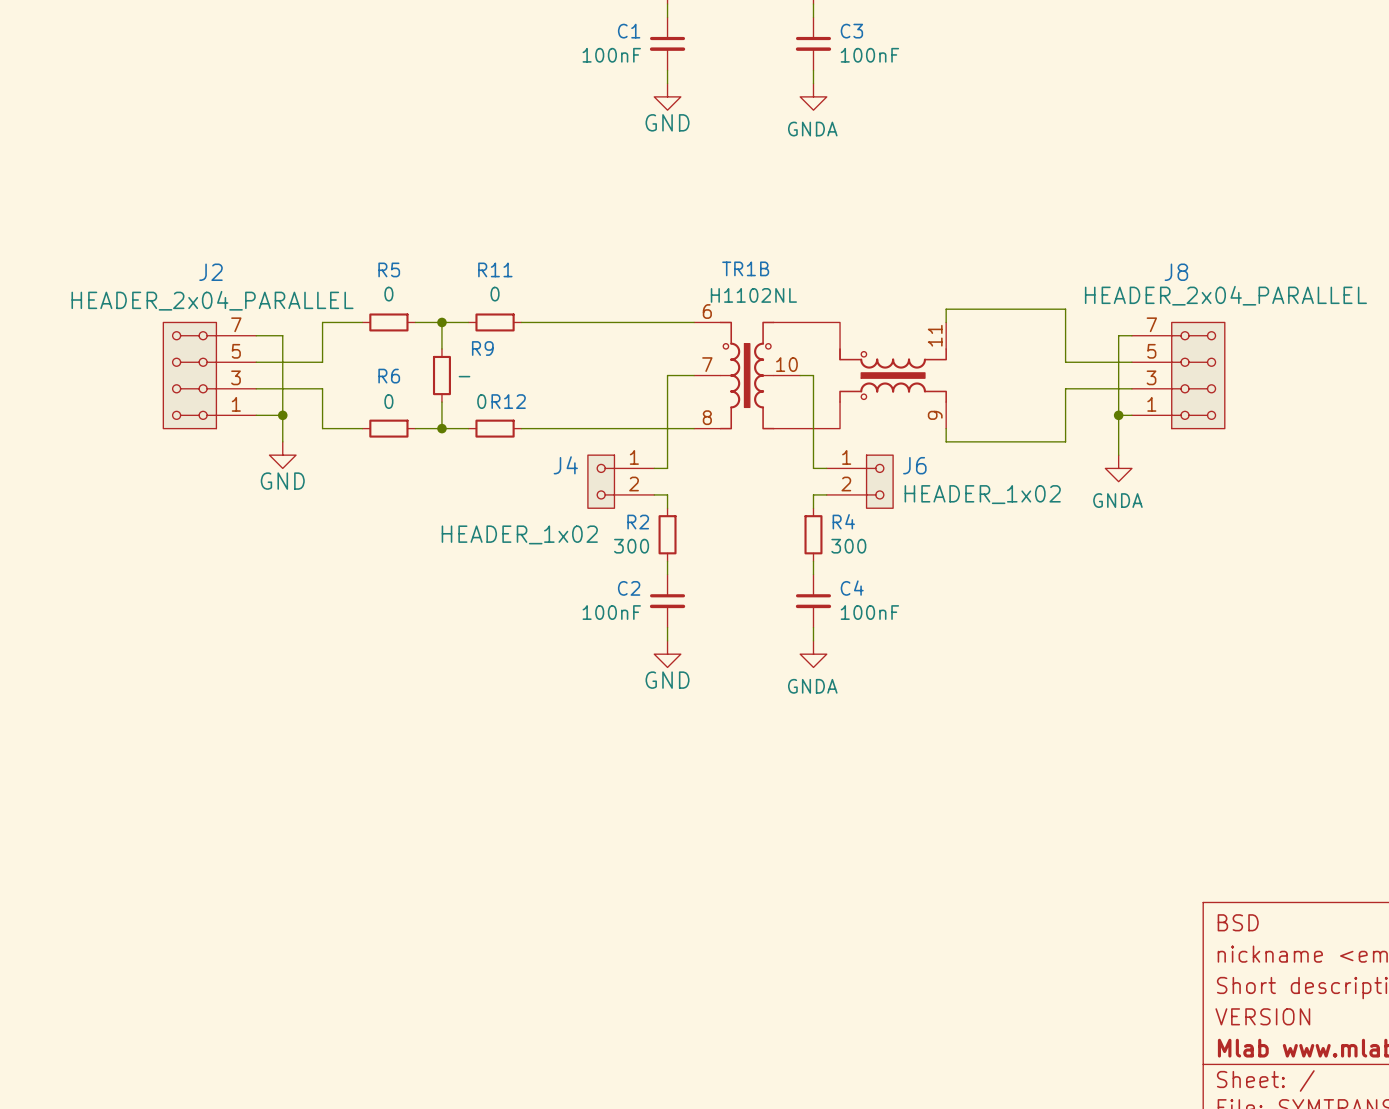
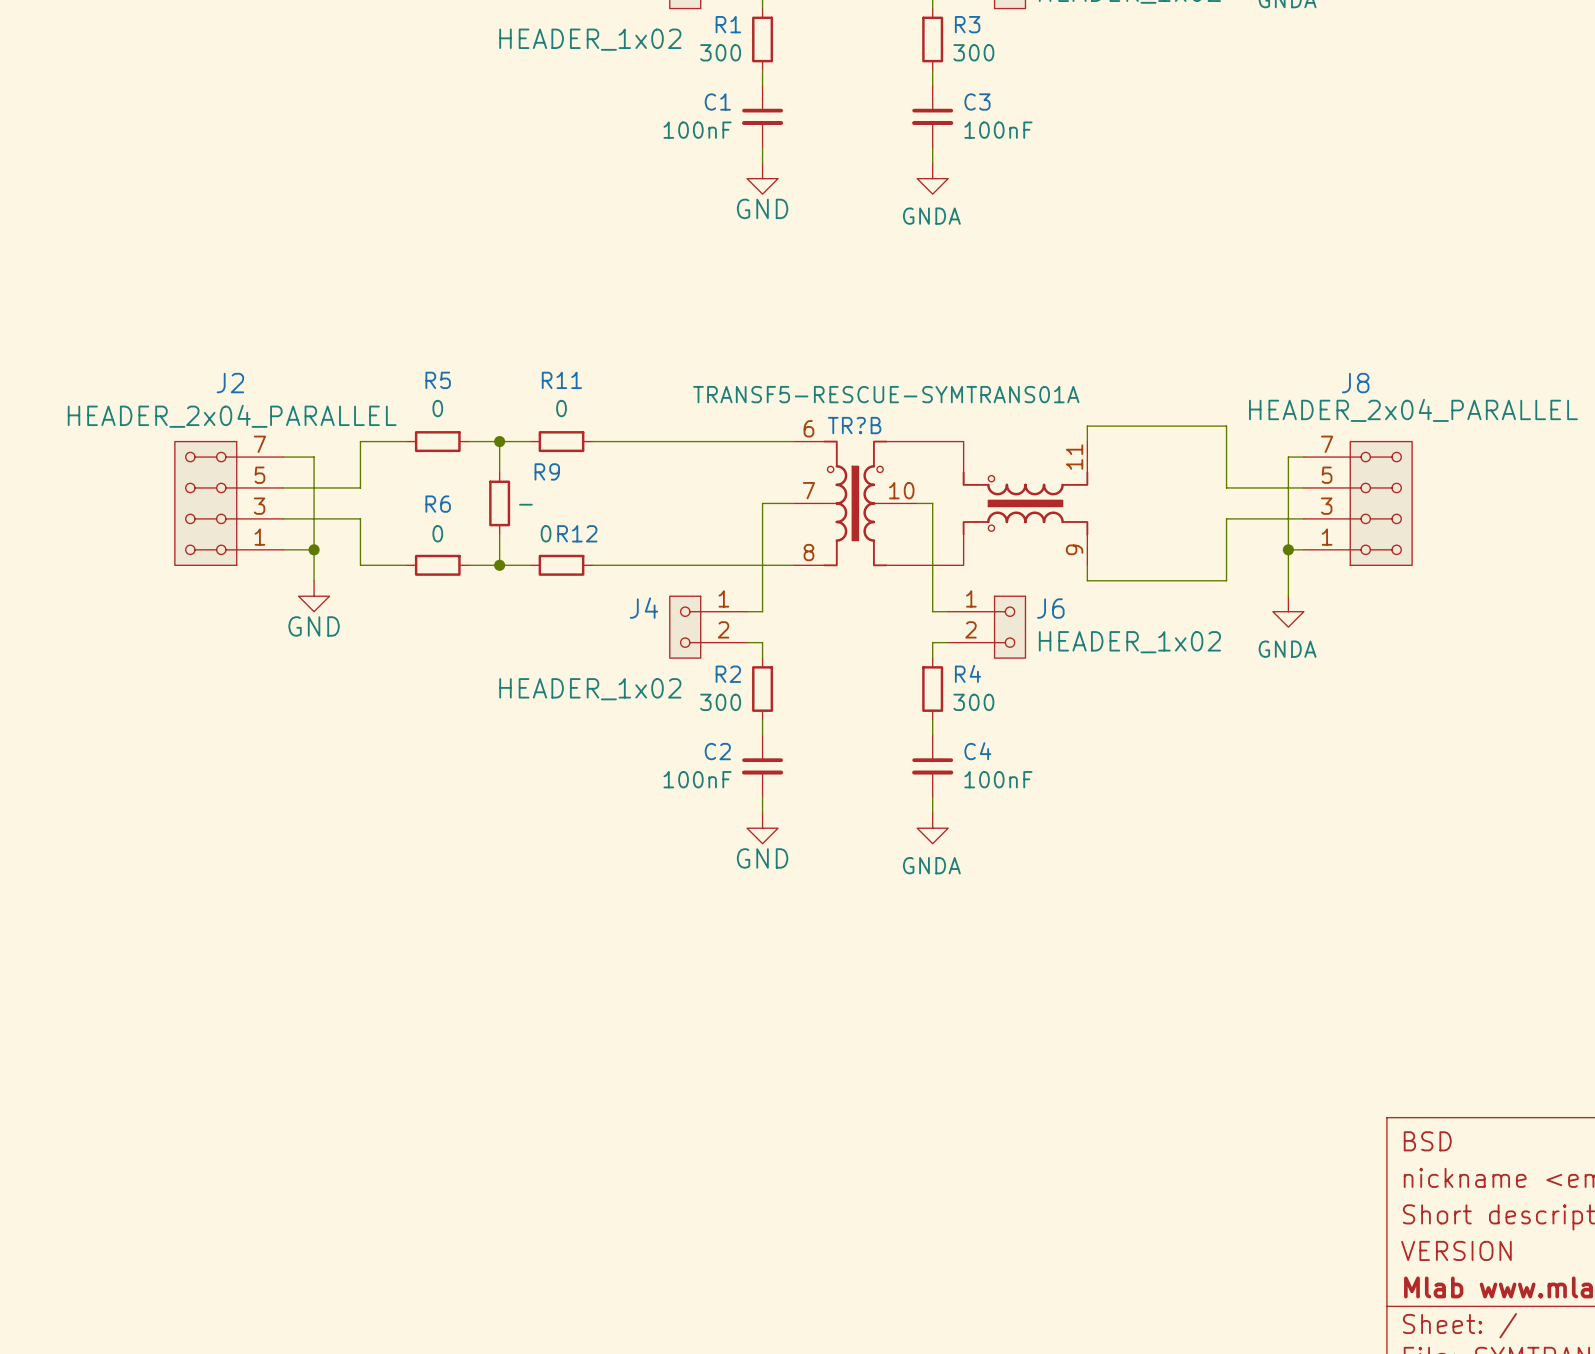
TR1B name: TR1B (745, 268) -> TR?B (854, 425)
TR1B value: H1102NL (753, 295) -> TRANSF5-RESCUE-SYMTRANS01A (886, 394)

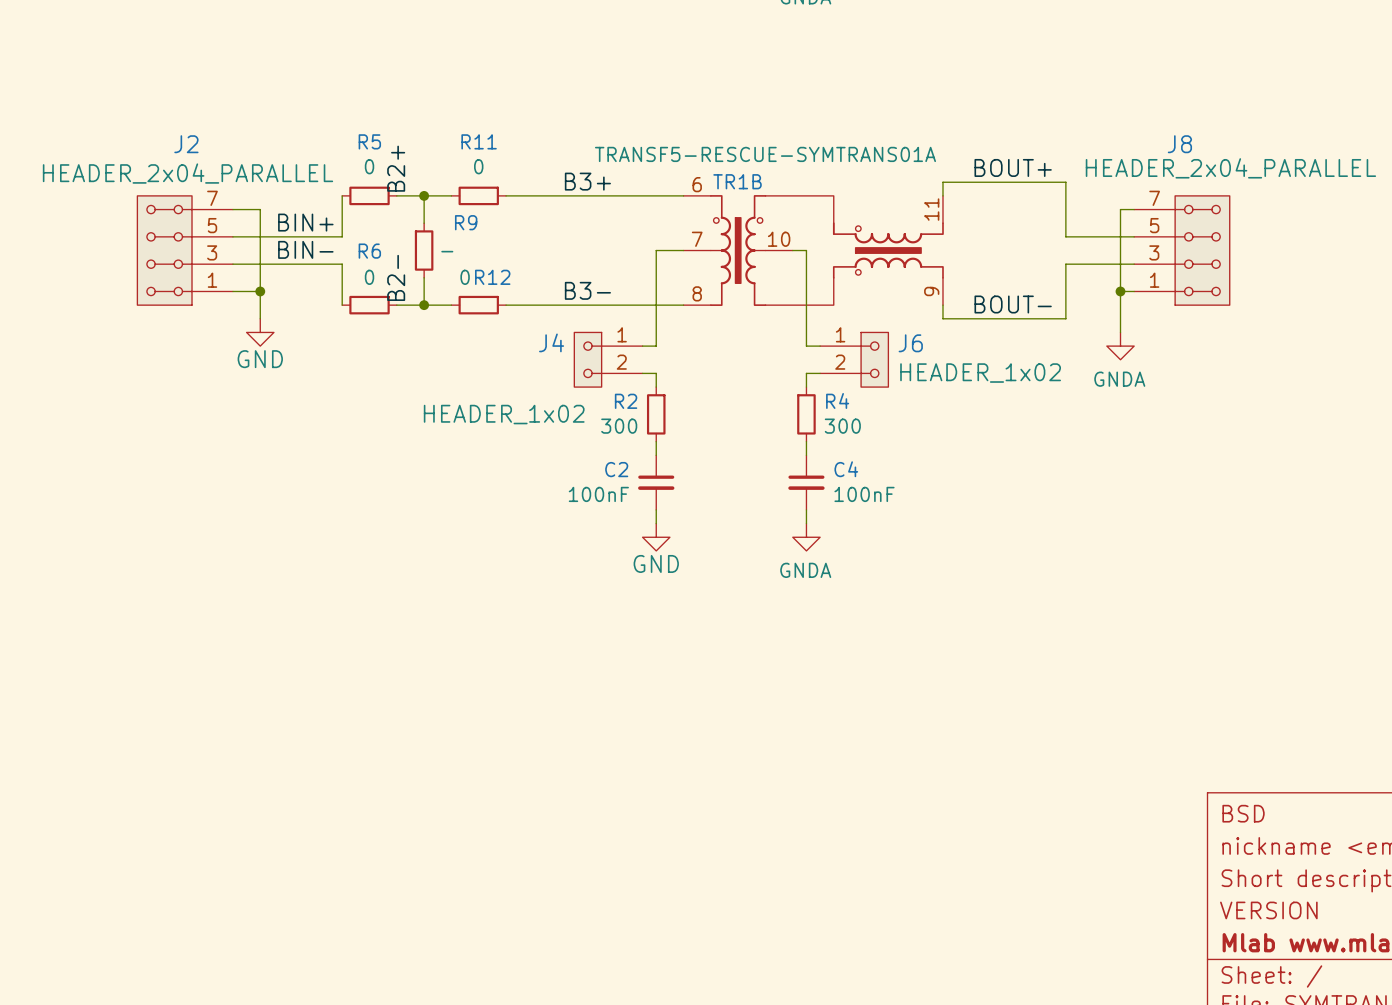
label: none -> BOUT+ (1013, 167)
label: none -> B2+ (396, 168)
label: none -> B3+ (587, 181)
TR?B name: TR?B (854, 425) -> TR1B (737, 181)
wire: (406, 441) (360, 441) (360, 487) -> (342, 195) (342, 236) (301, 236)
label: none -> BIN+ (305, 222)
label: none -> BIN- (305, 249)
wire: (360, 518) (360, 565) (406, 565) -> (301, 264) (342, 264) (342, 305)
label: none -> B2- (396, 277)
label: none -> B3- (587, 290)
label: none -> BOUT- (1013, 304)

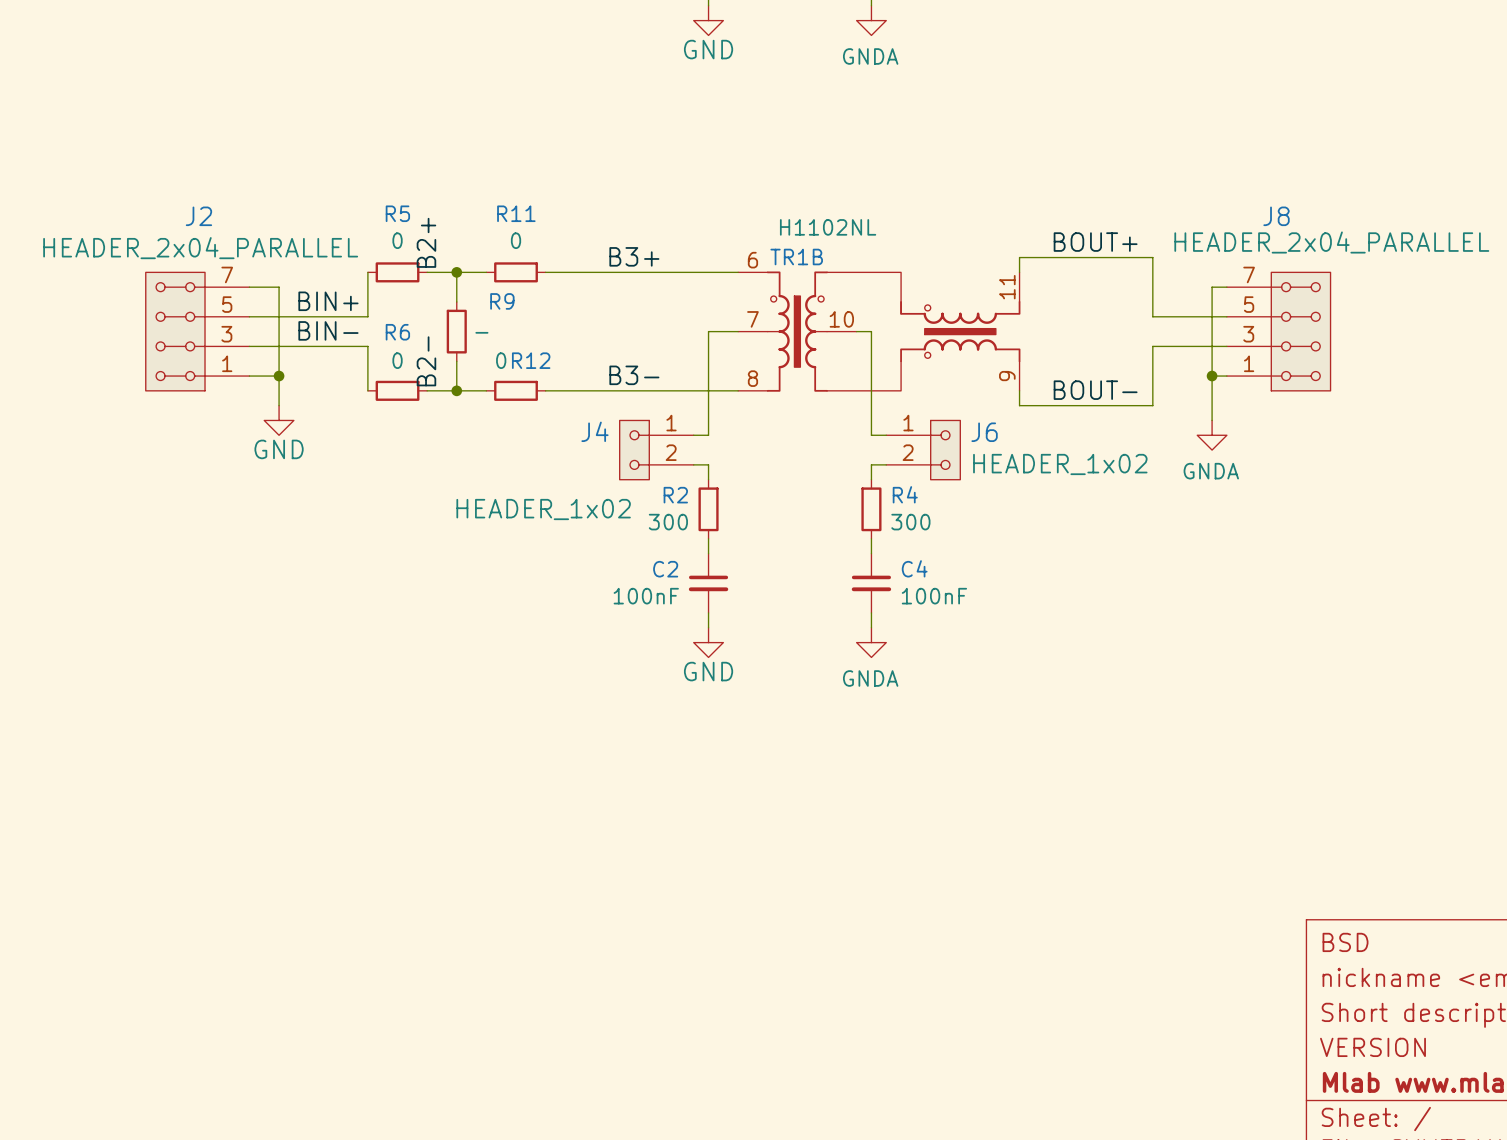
TR1B value: TRANSF5-RESCUE-SYMTRANS01A (765, 154) -> H1102NL (828, 227)

